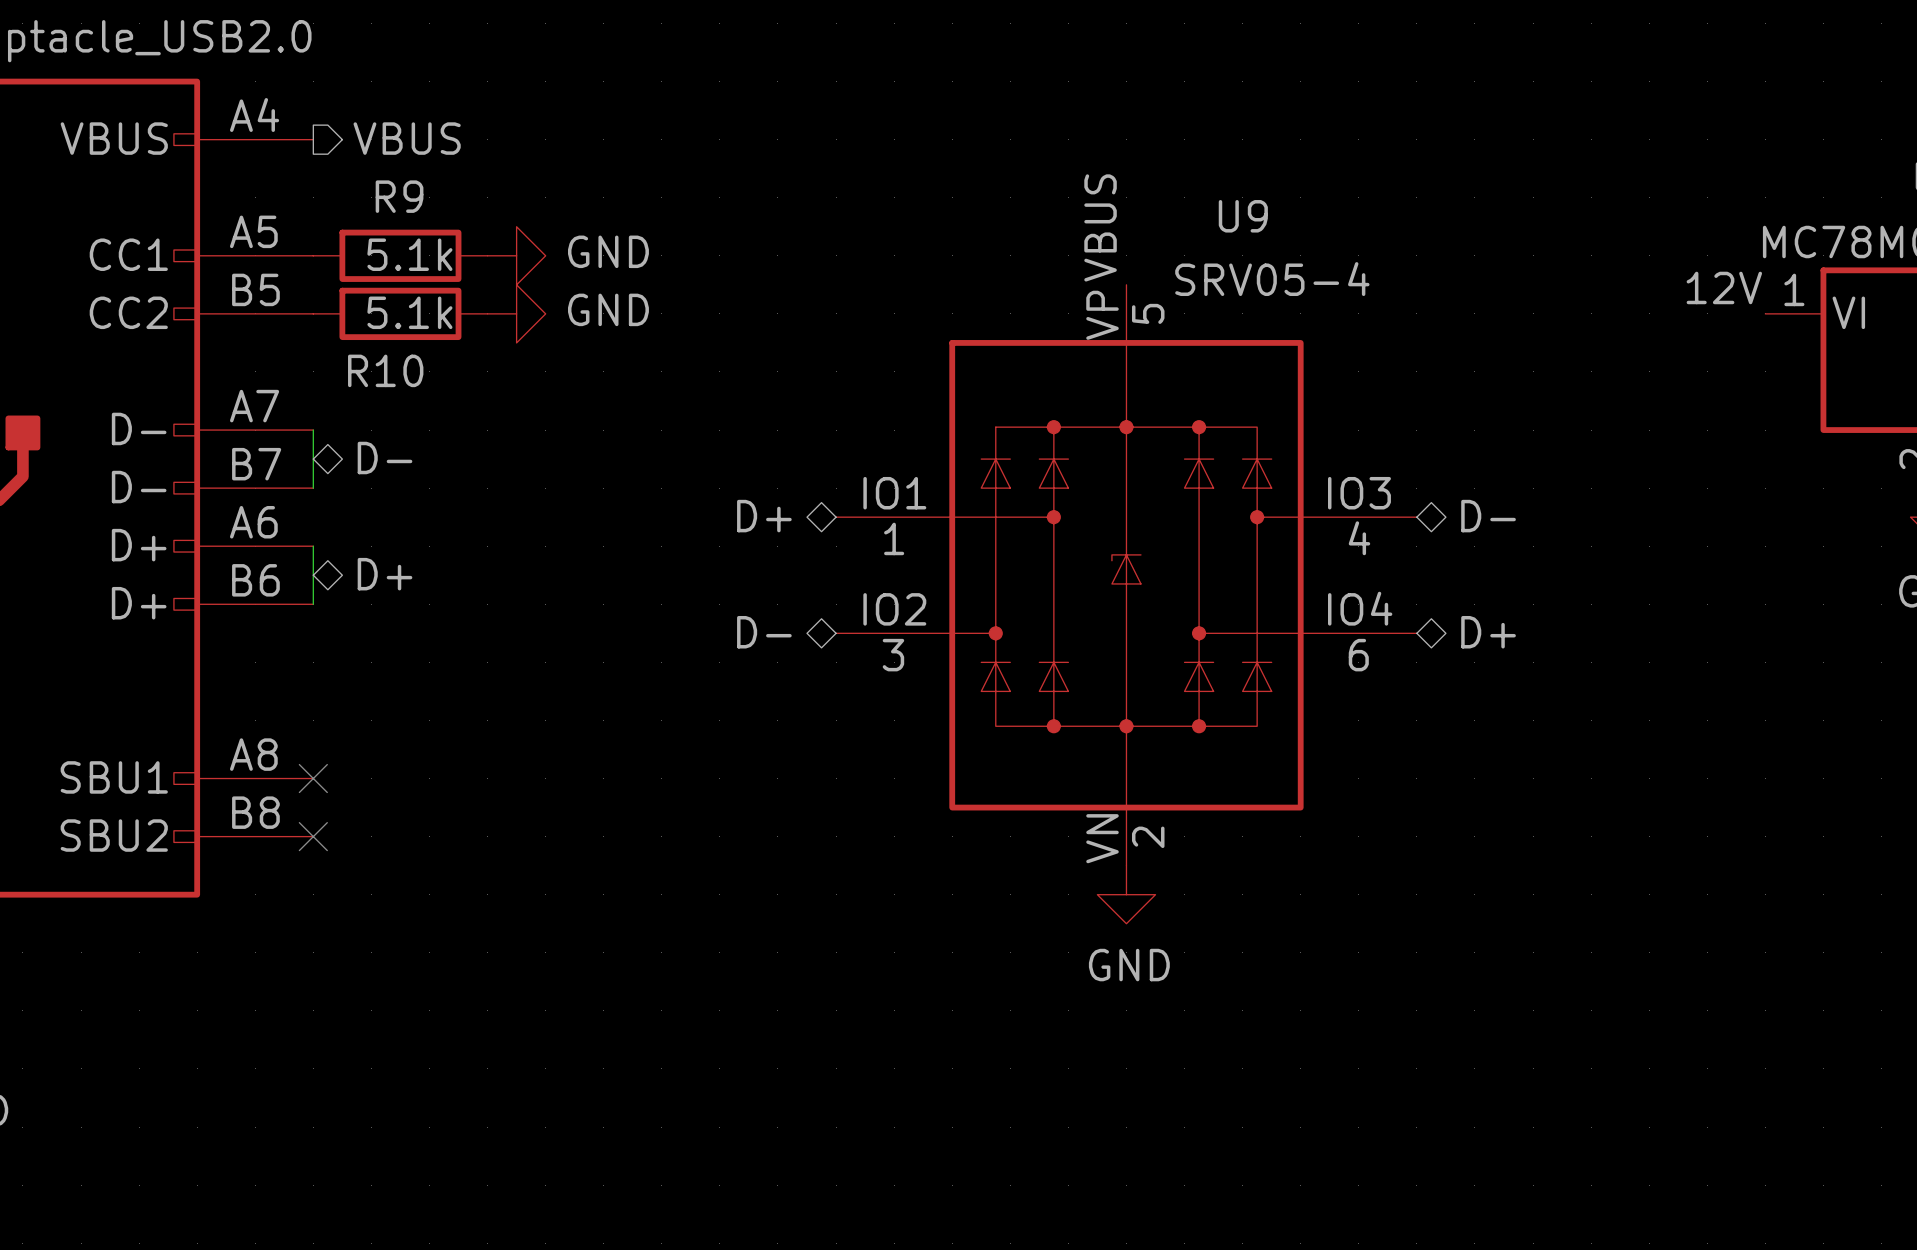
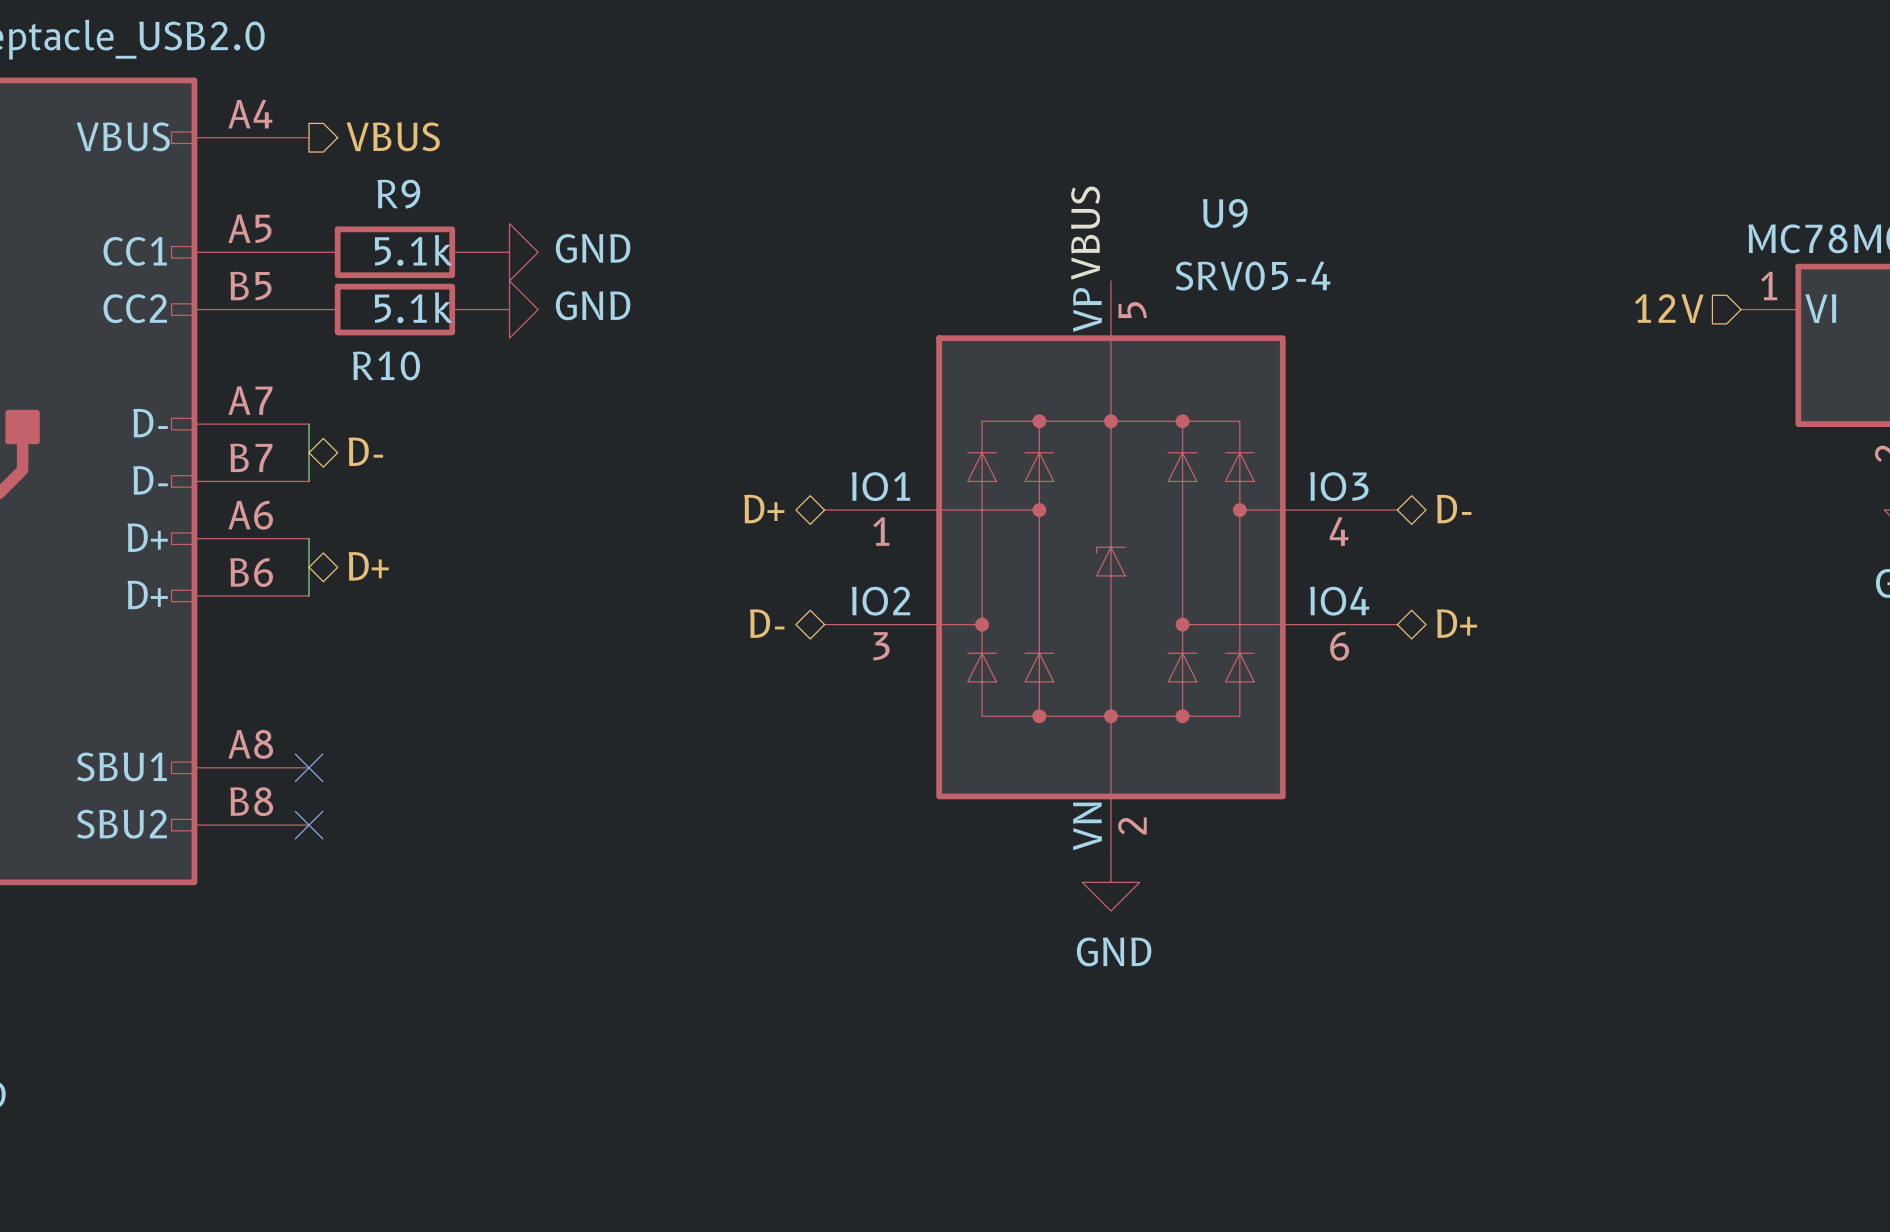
label: 12V (1724, 287) -> none
hierarchical label: none -> 12V (1669, 308)

